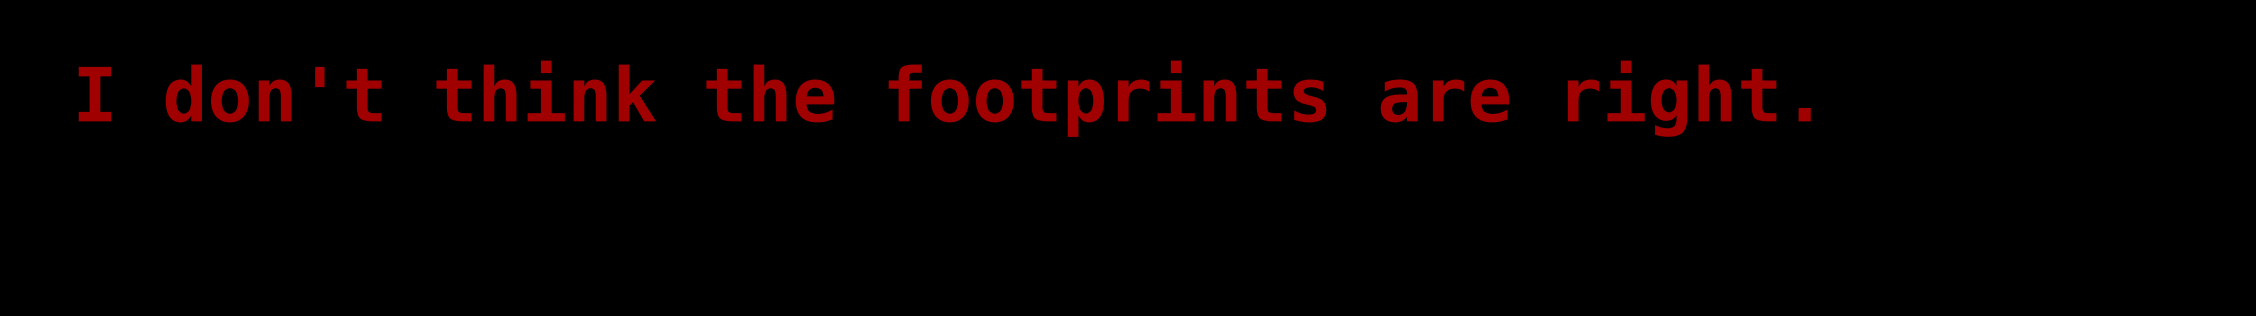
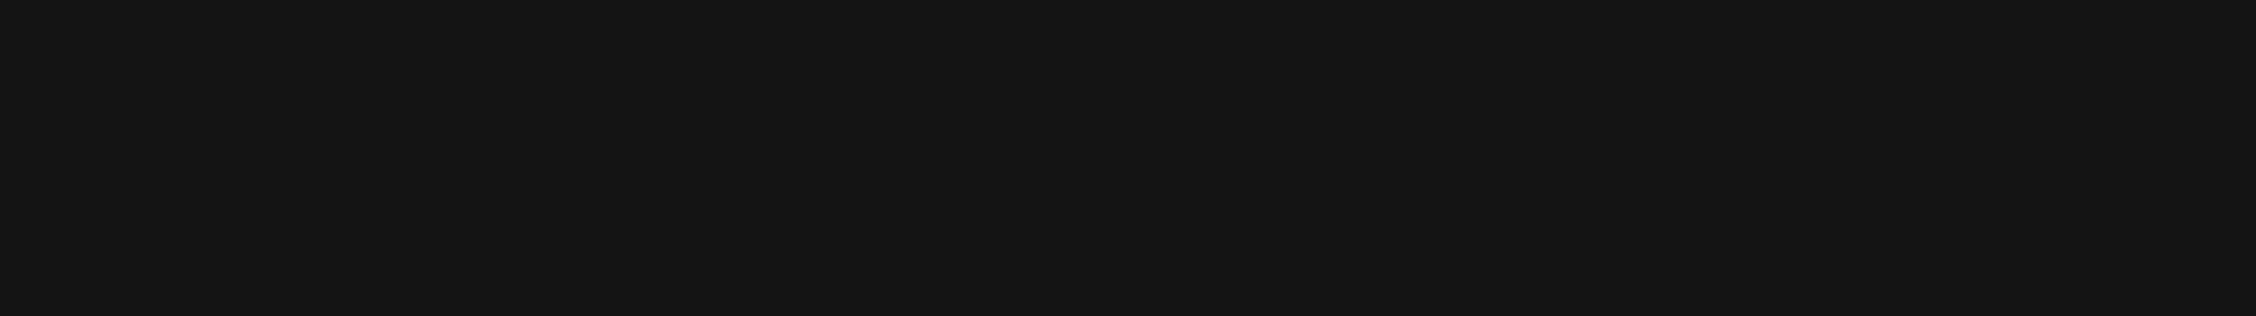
text: I don't think the footprints are right. (944, 98) -> none

